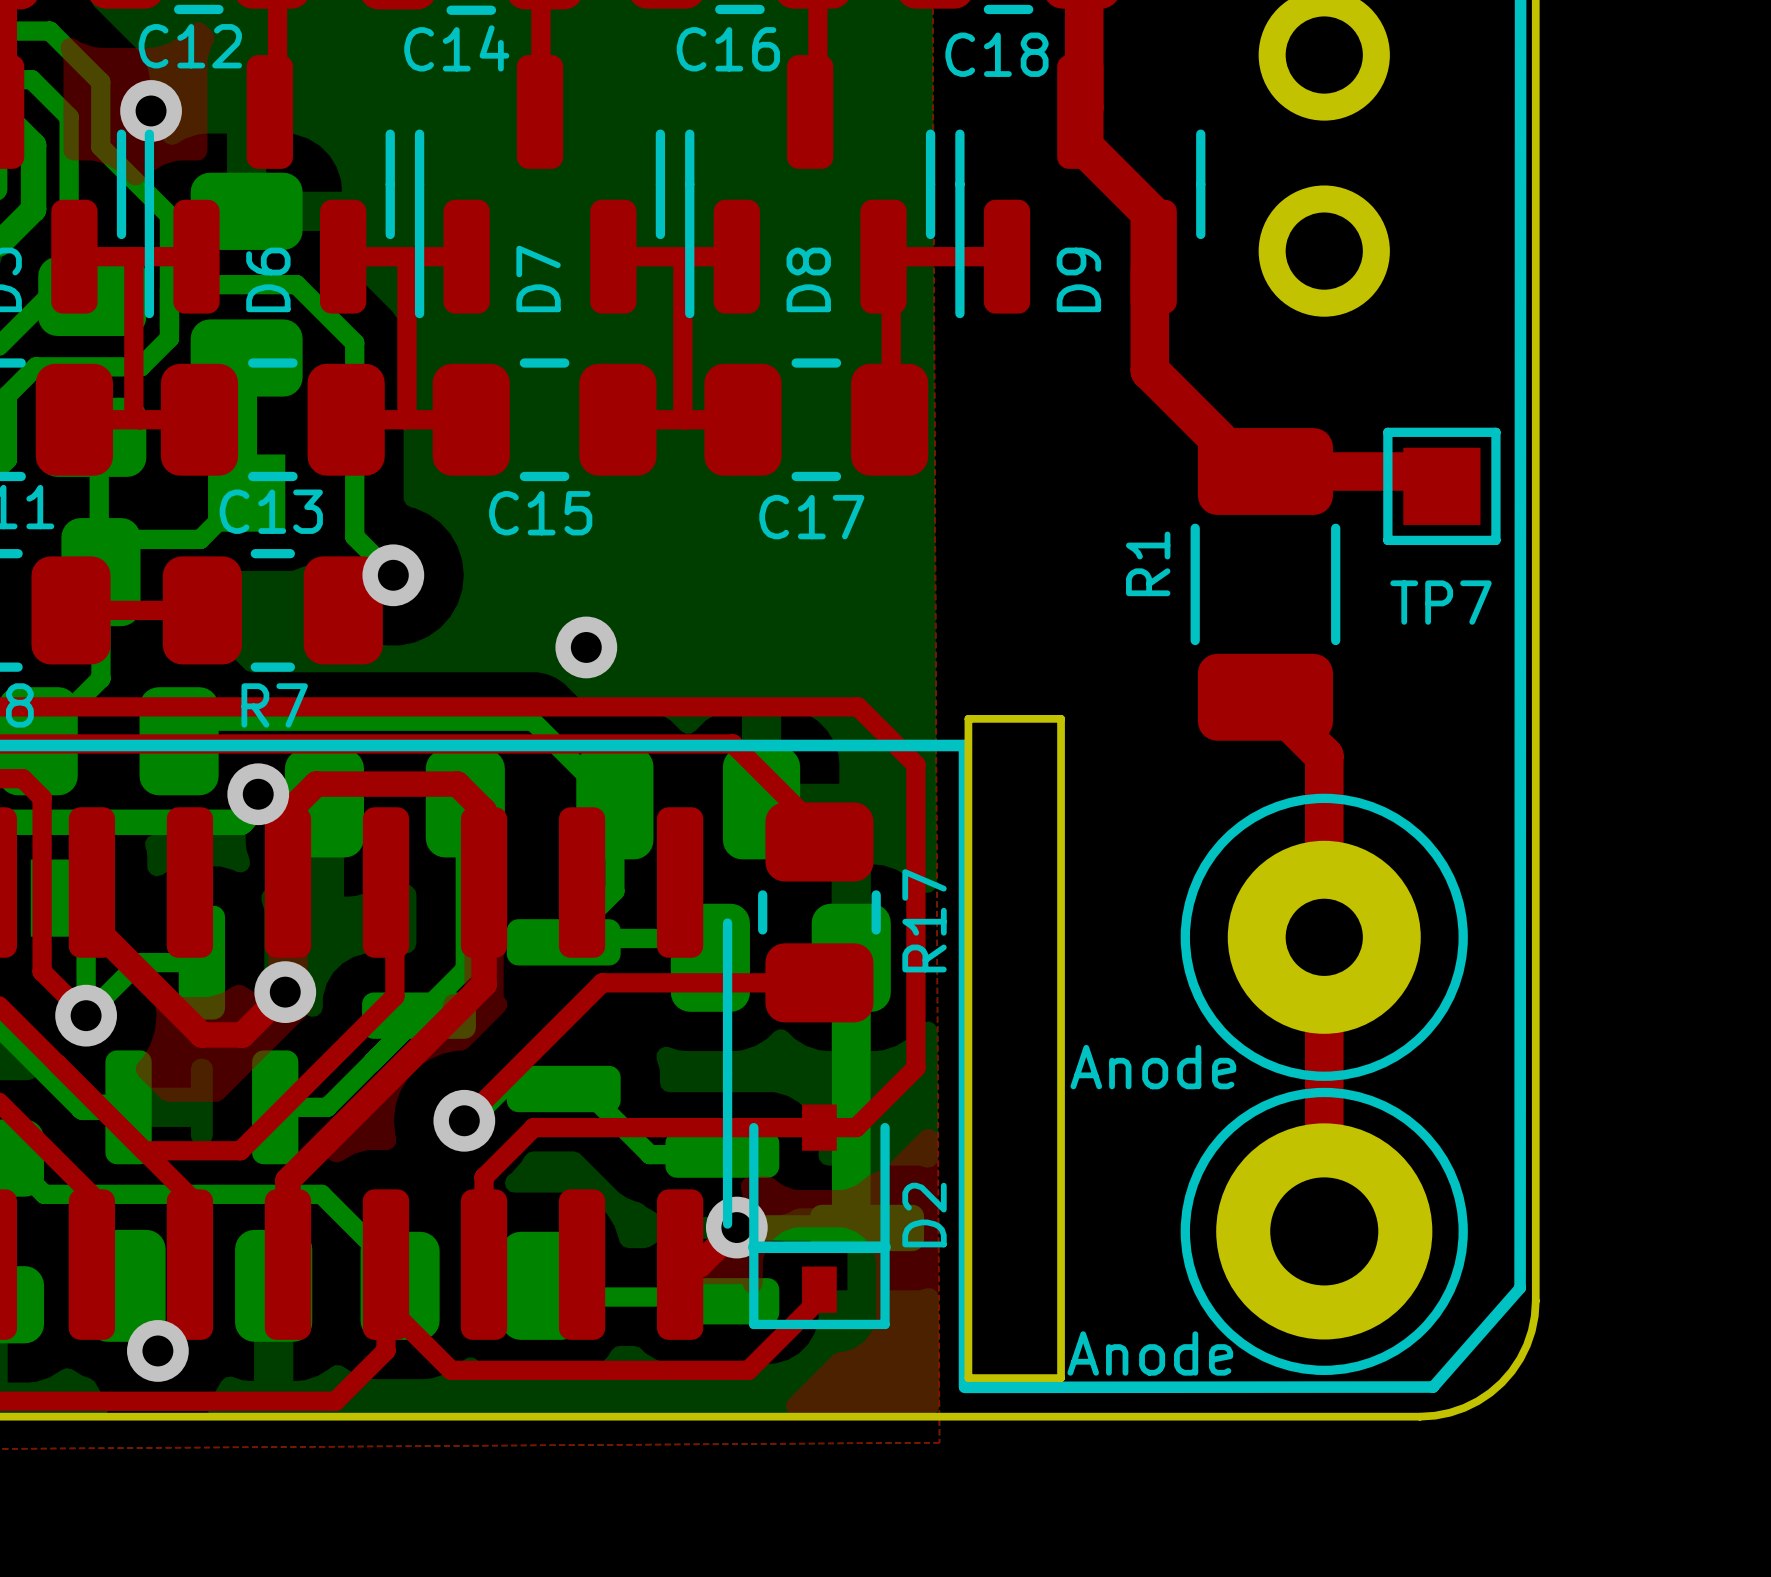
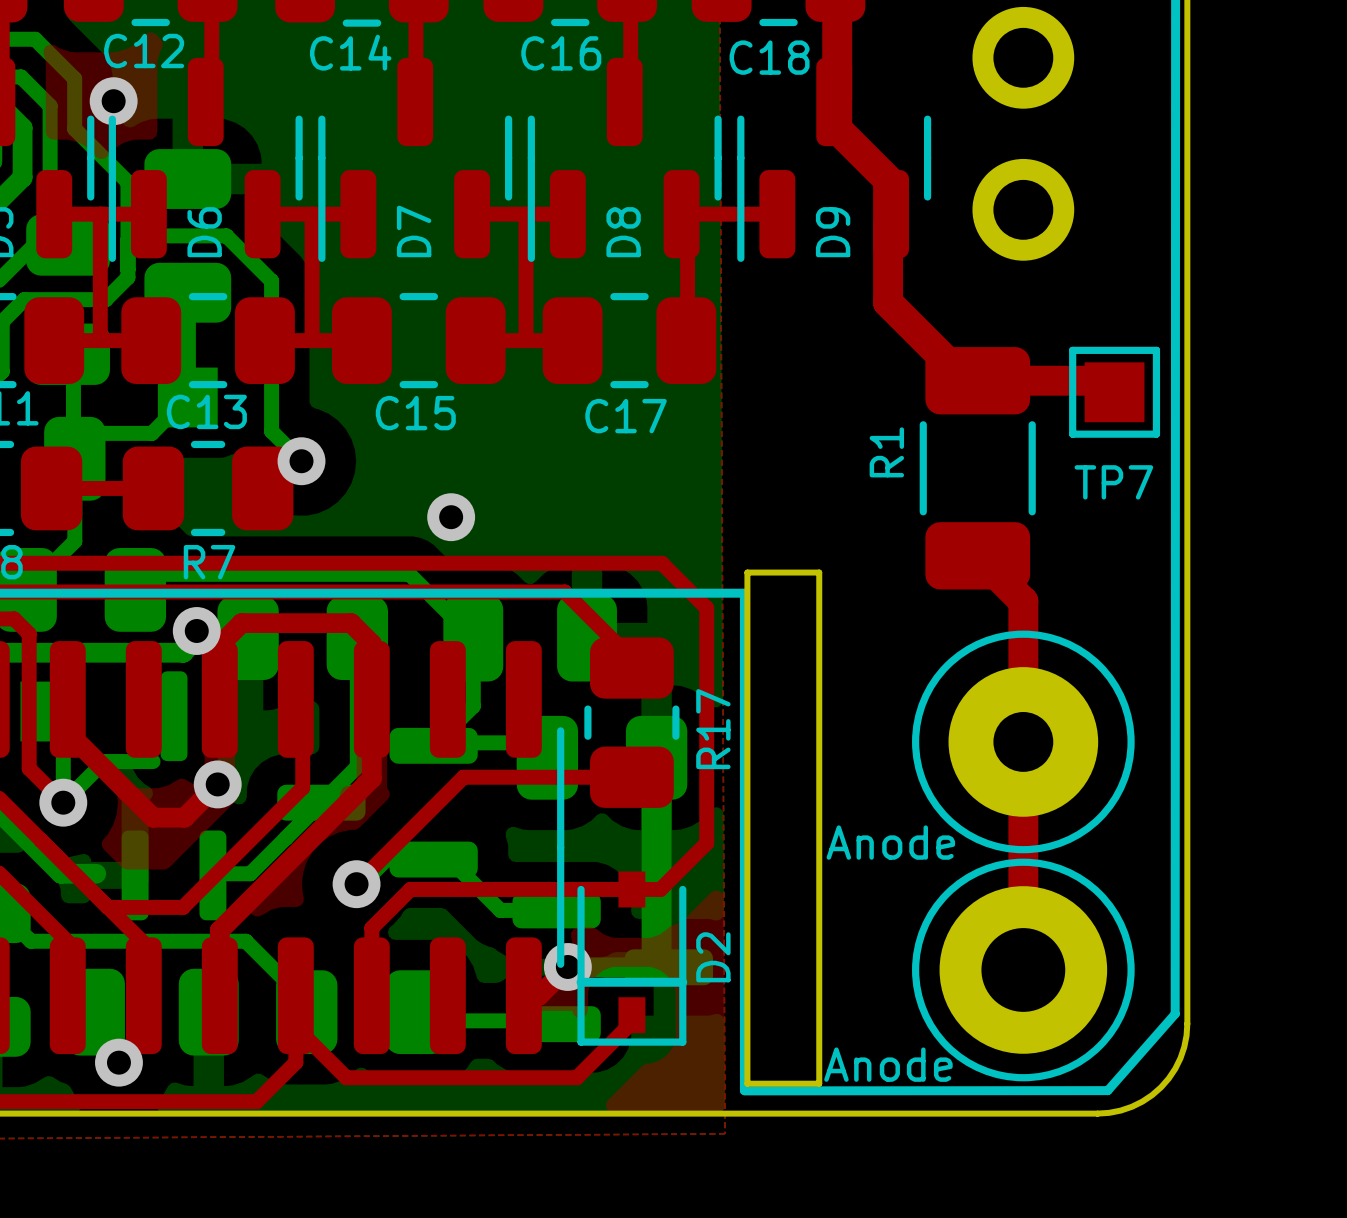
part footprint: [105, 905, 299, 1165] -> [121, 671, 227, 921]

